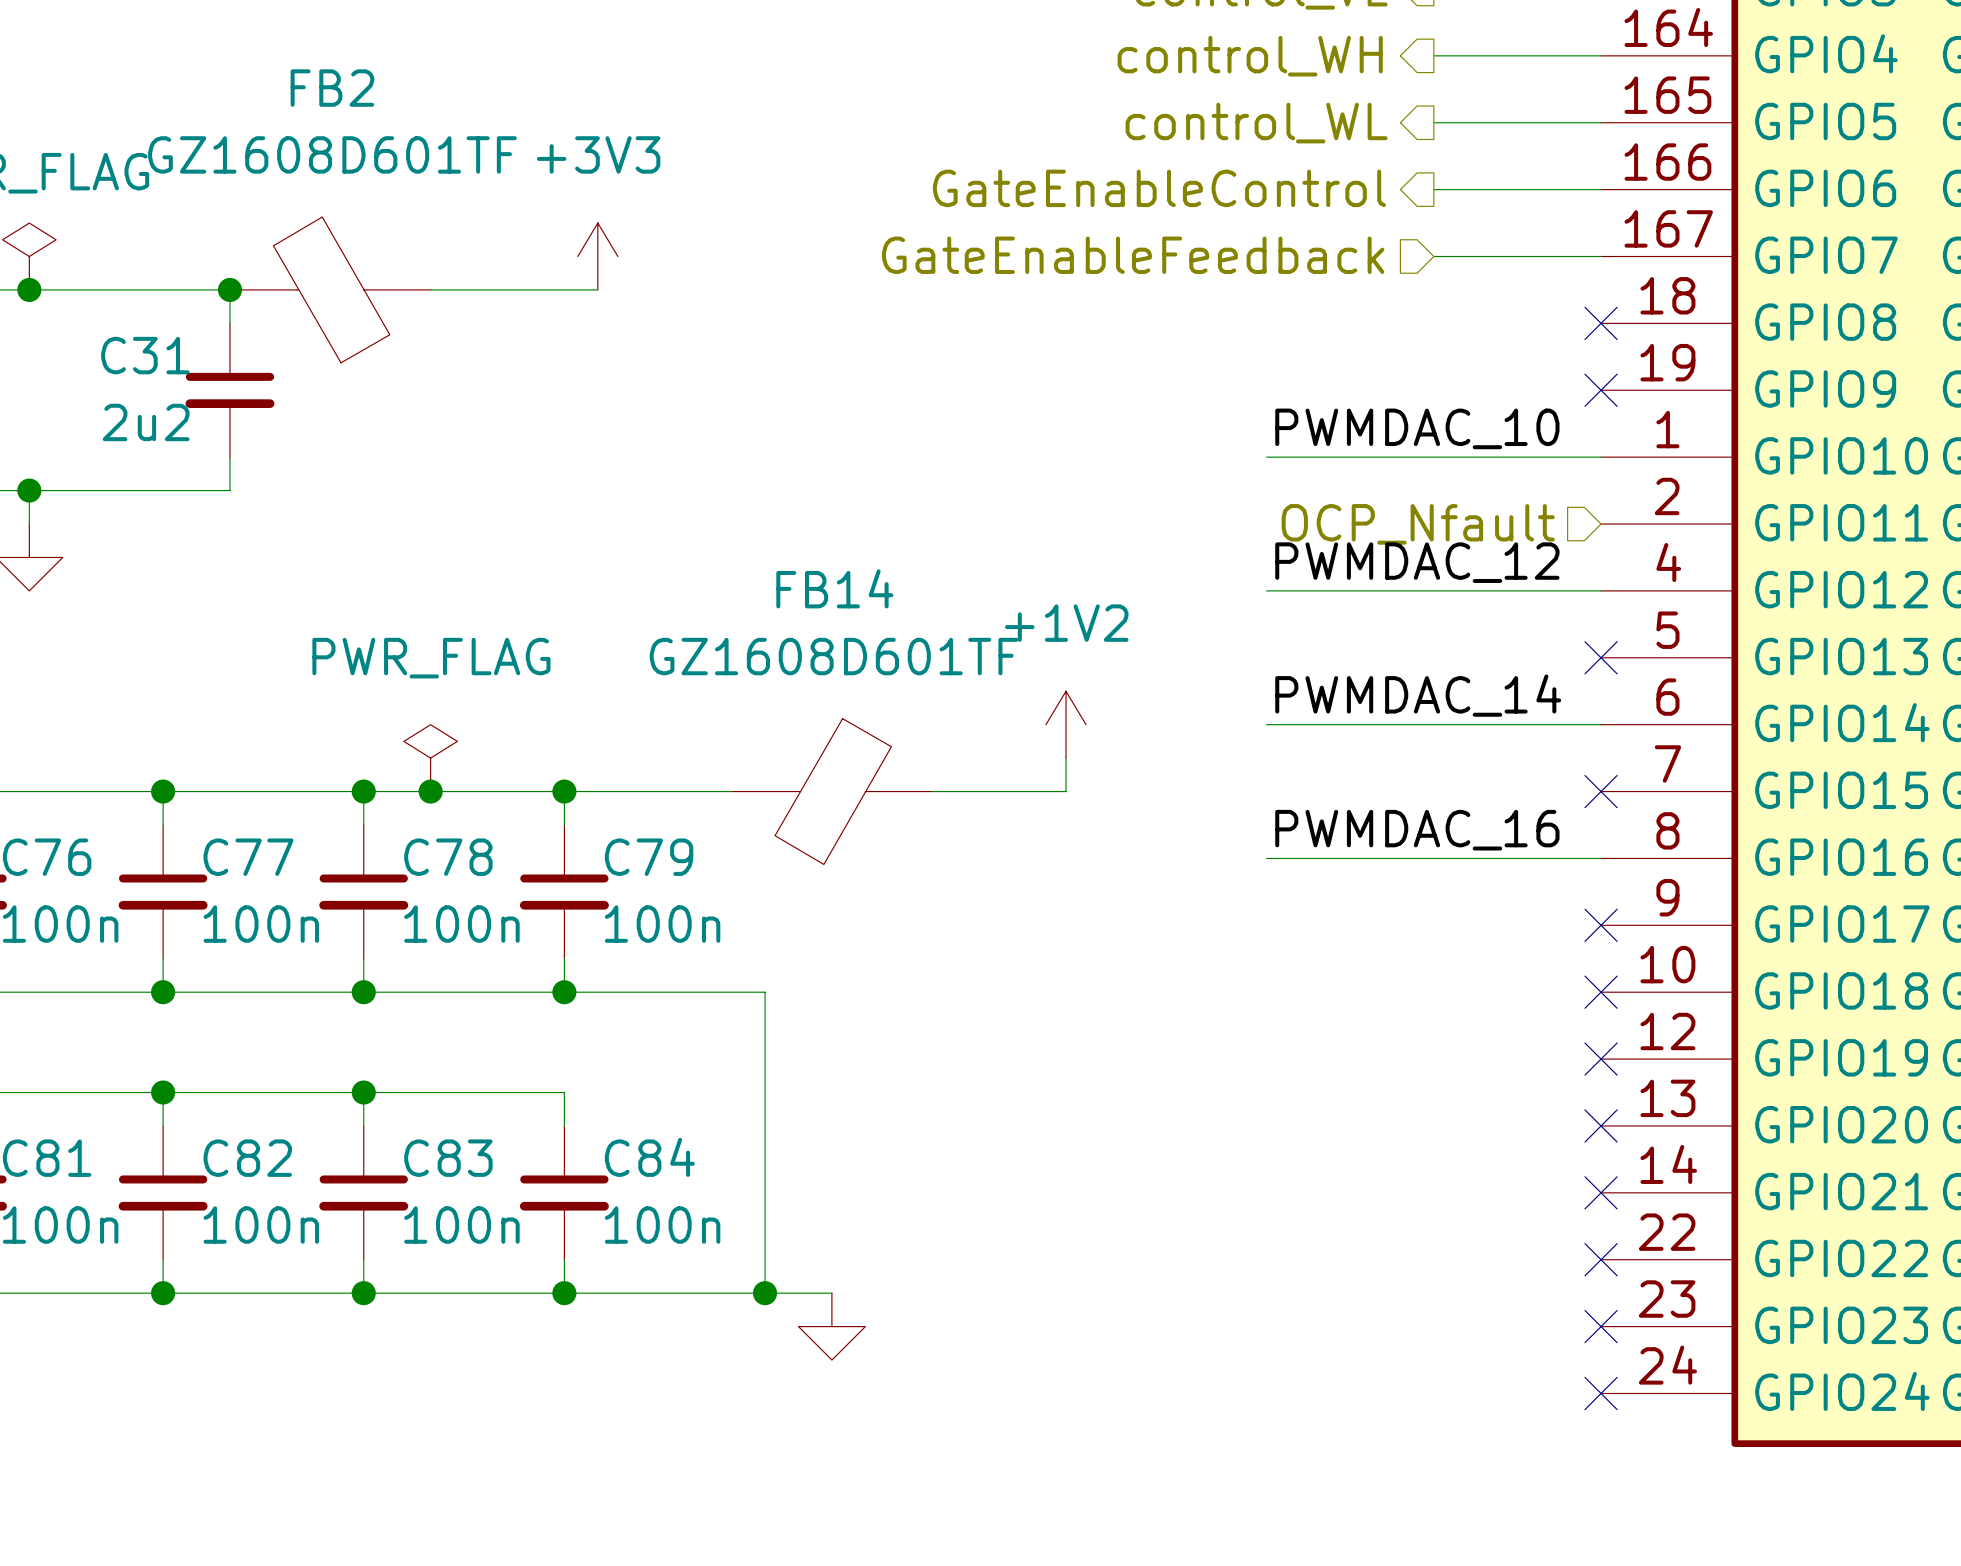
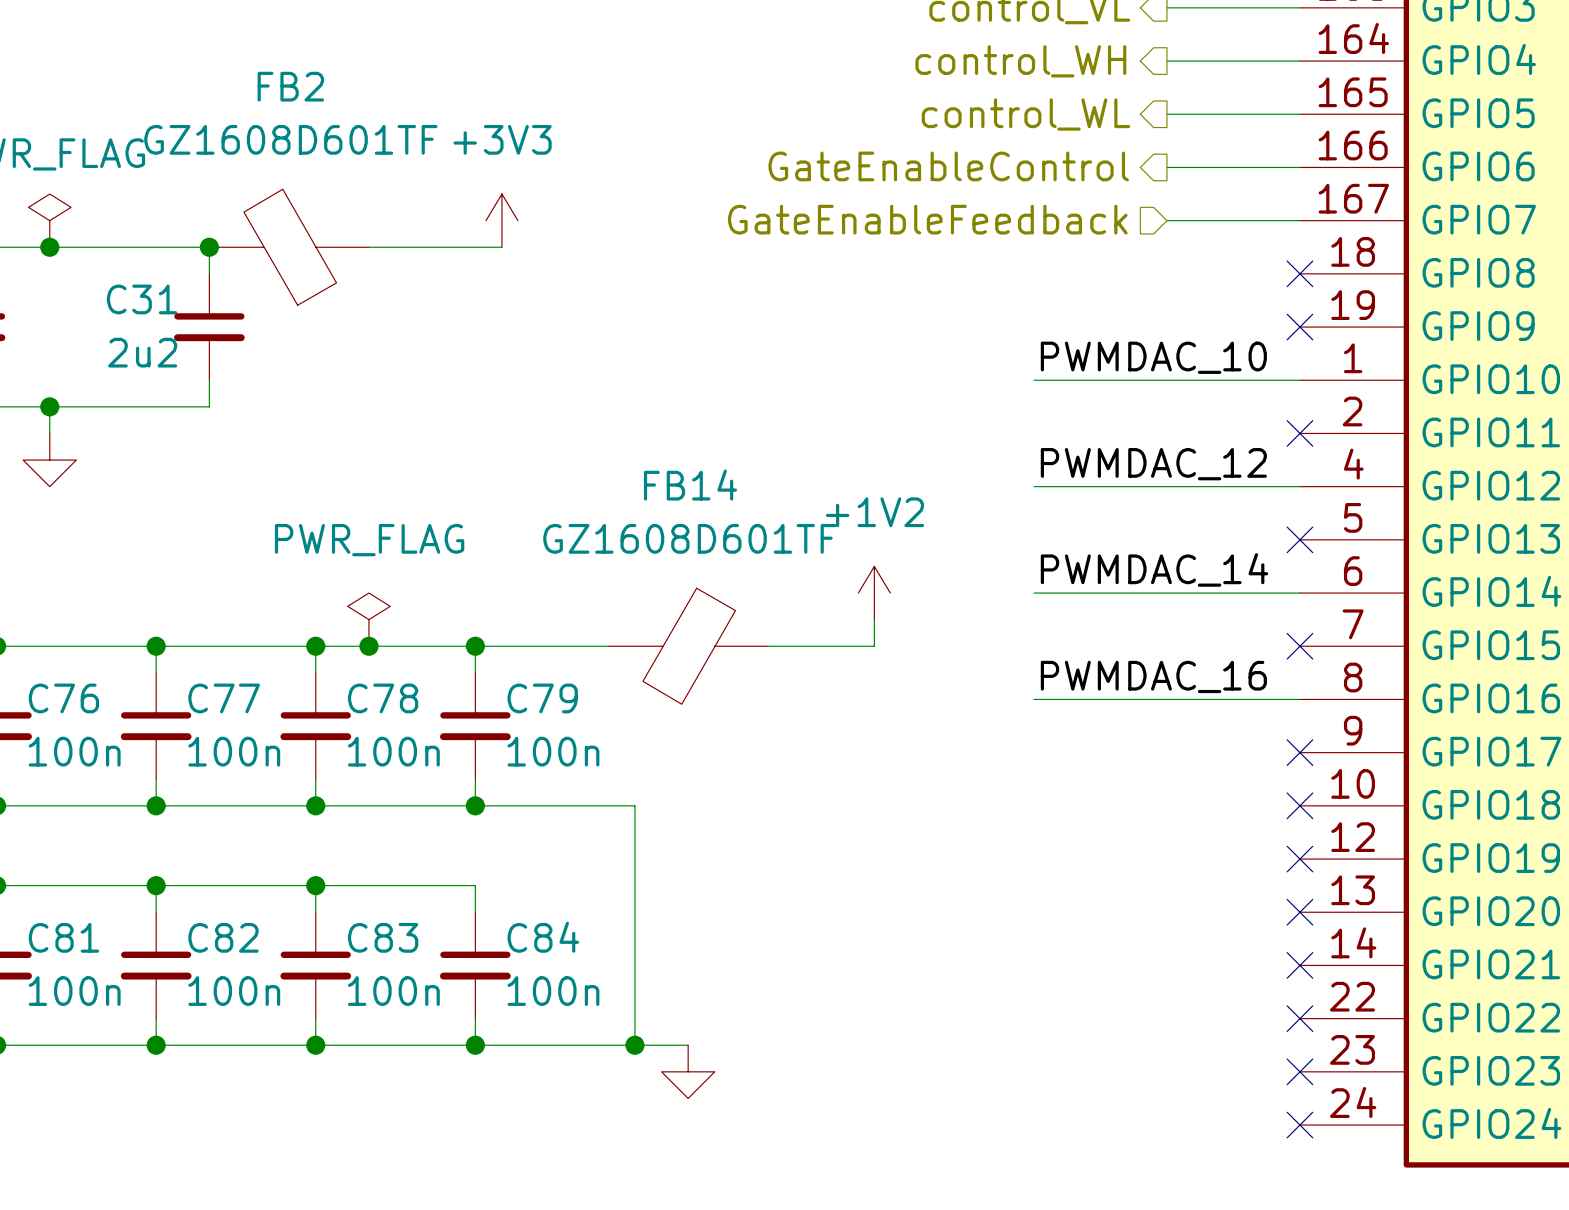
hierarchical label: OCP_Nfault (1418, 524) -> none
no-connect mark: none -> (1299, 433)

